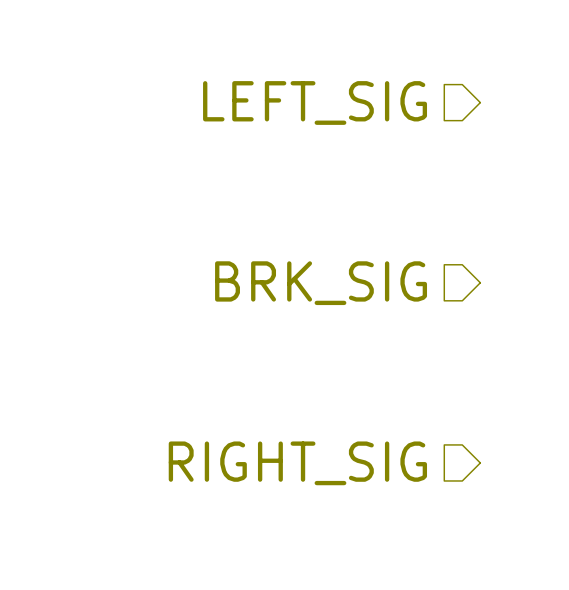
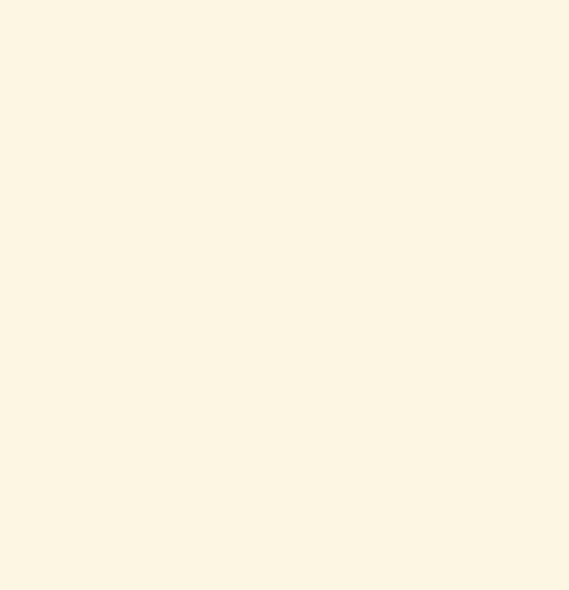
hierarchical label: LEFT_SIG (315, 102) -> none
hierarchical label: BRK_SIG (321, 283) -> none
hierarchical label: RIGHT_SIG (297, 463) -> none

